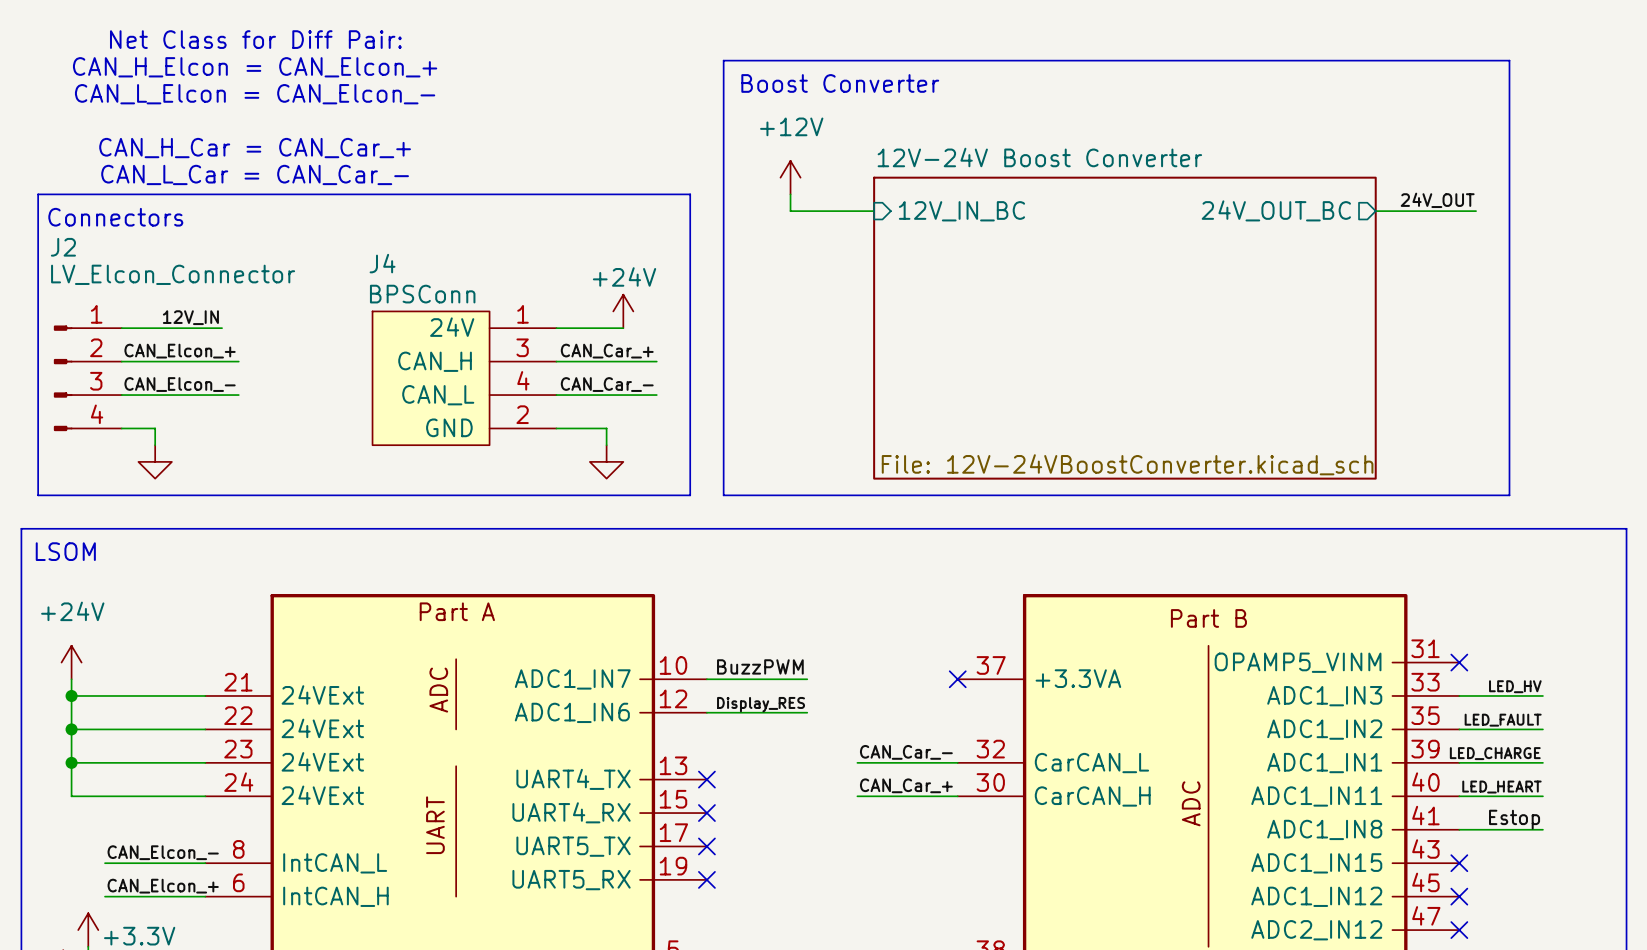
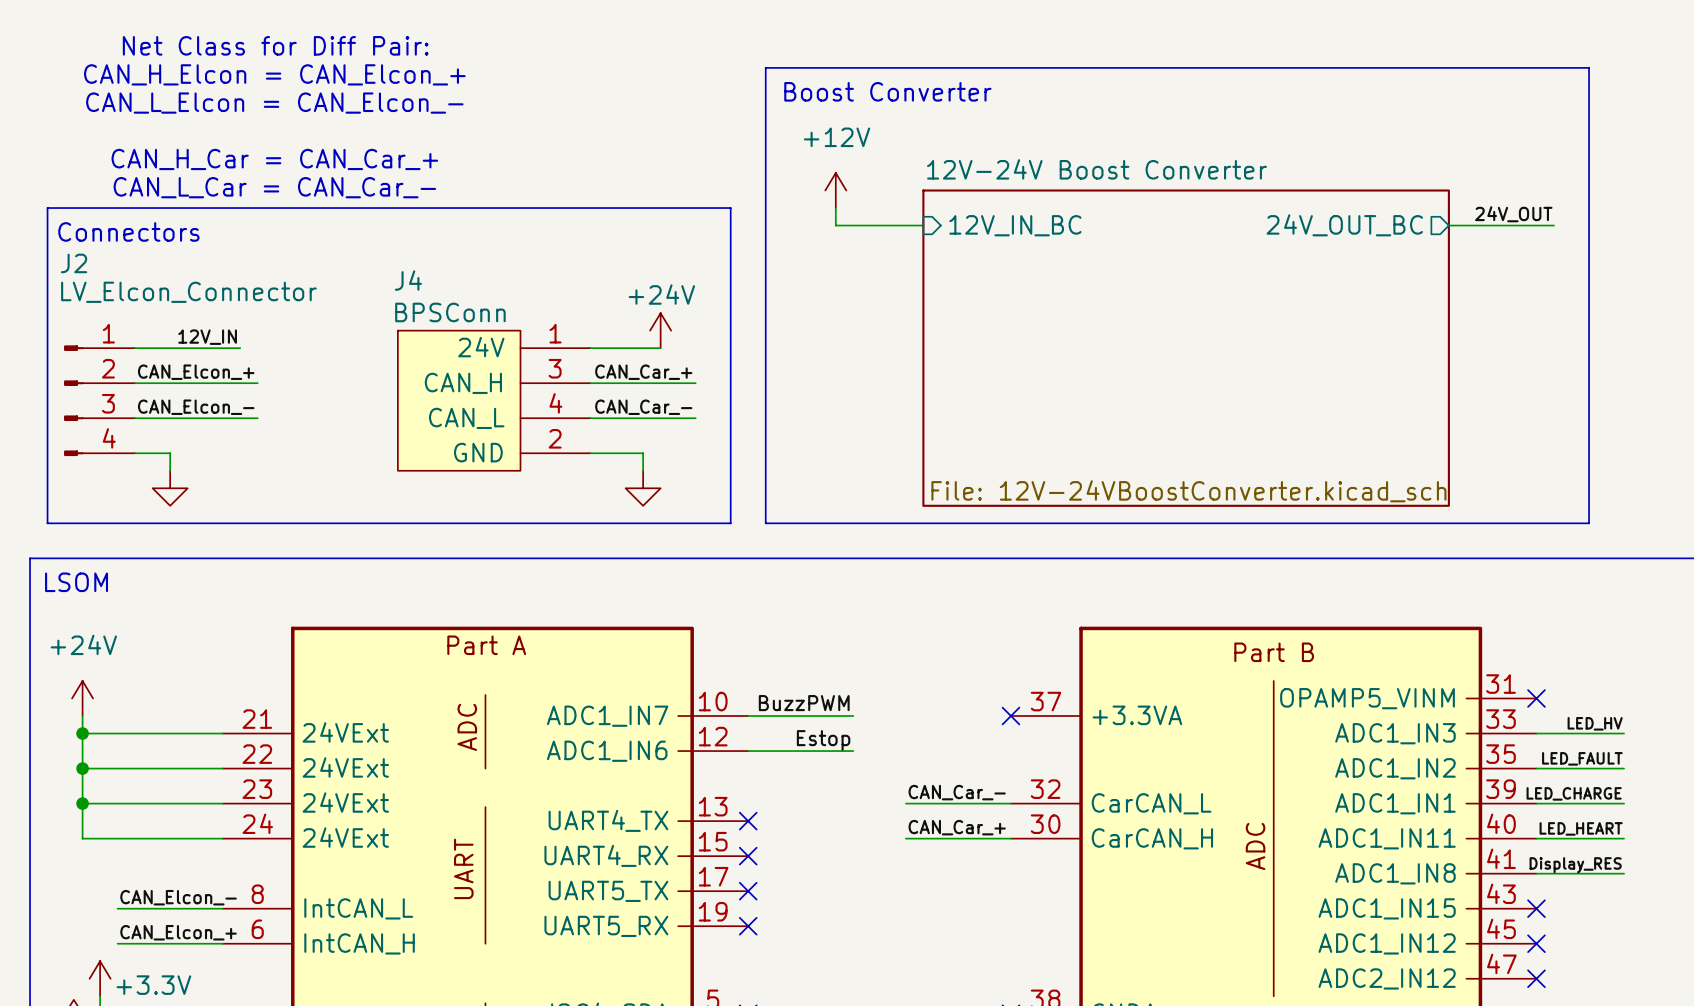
label: Display_RES (761, 704) -> Estop (823, 740)
label: Estop (1514, 819) -> Display_RES (1575, 865)

